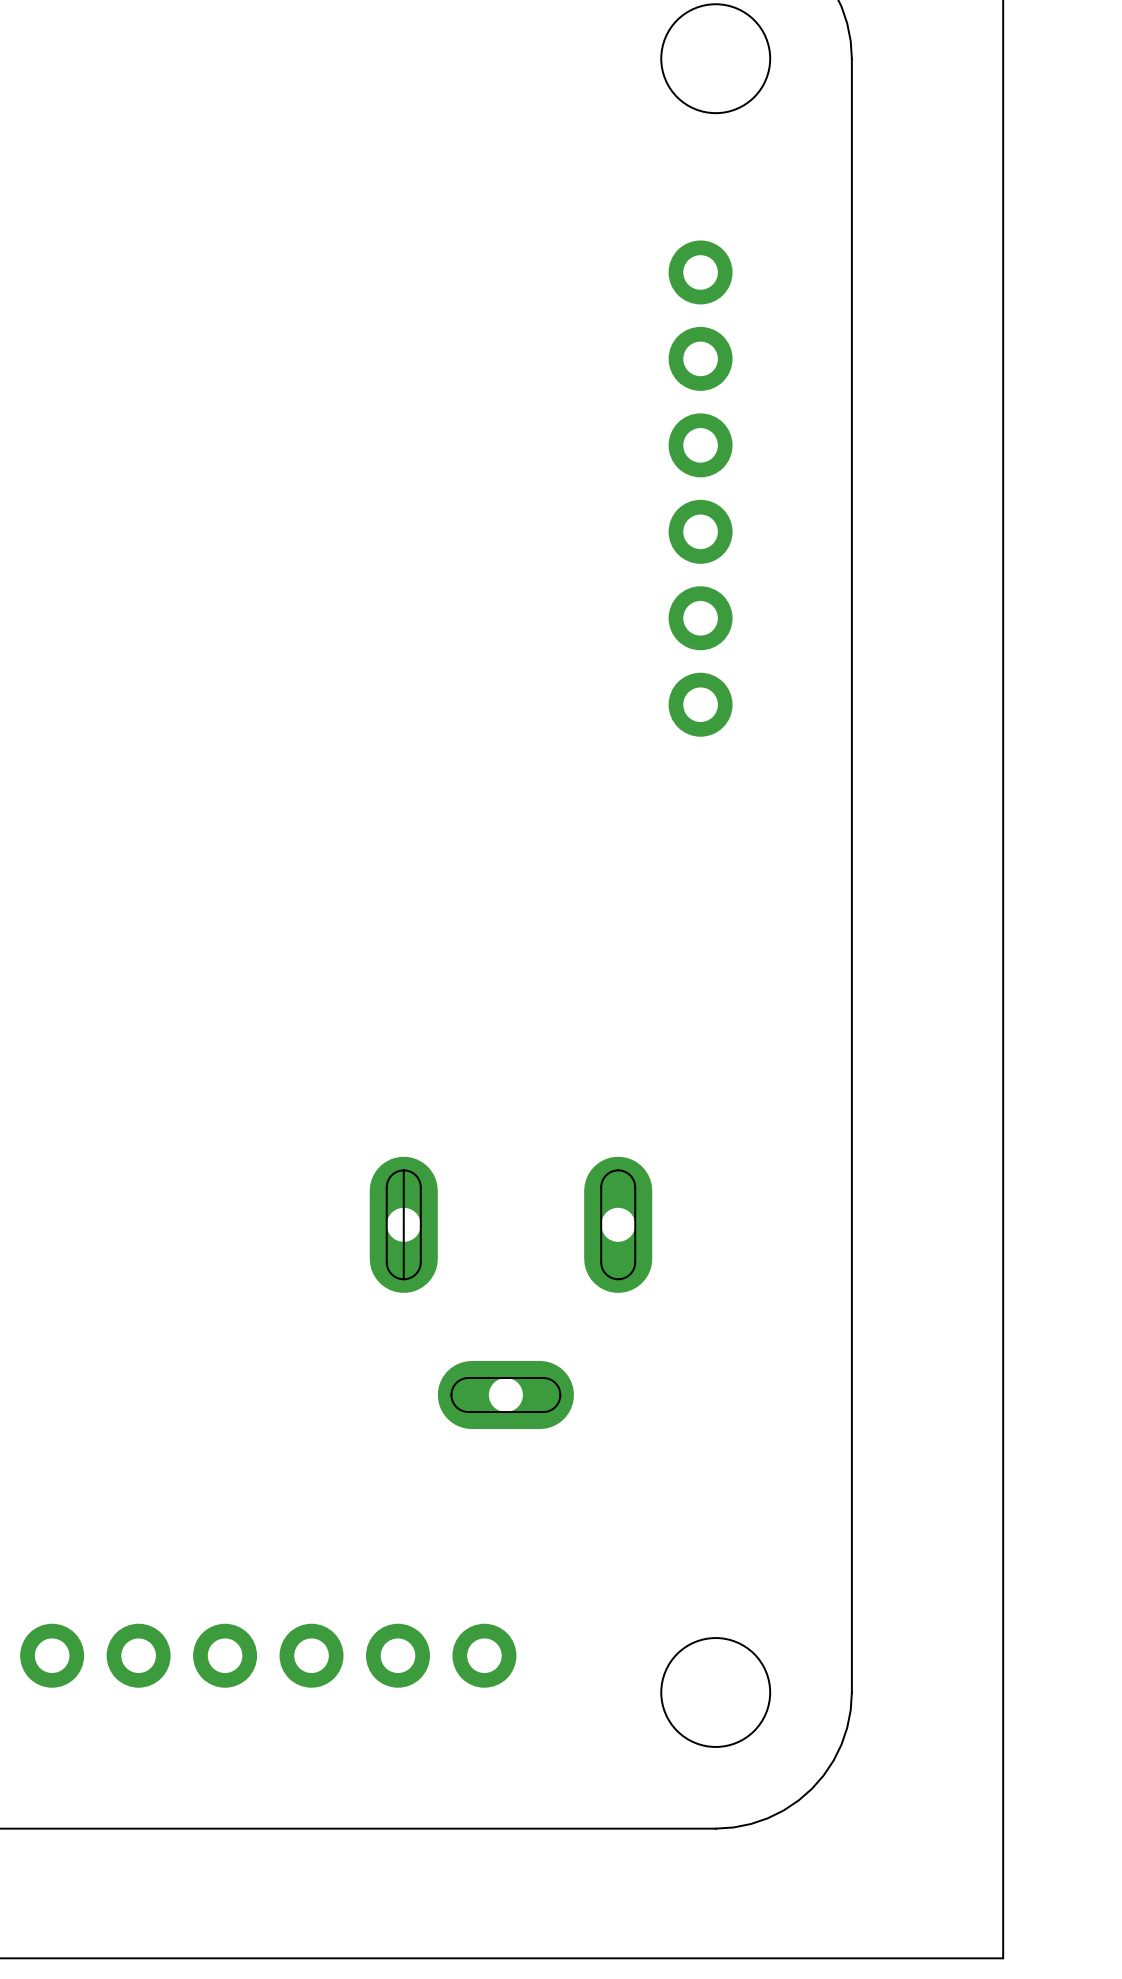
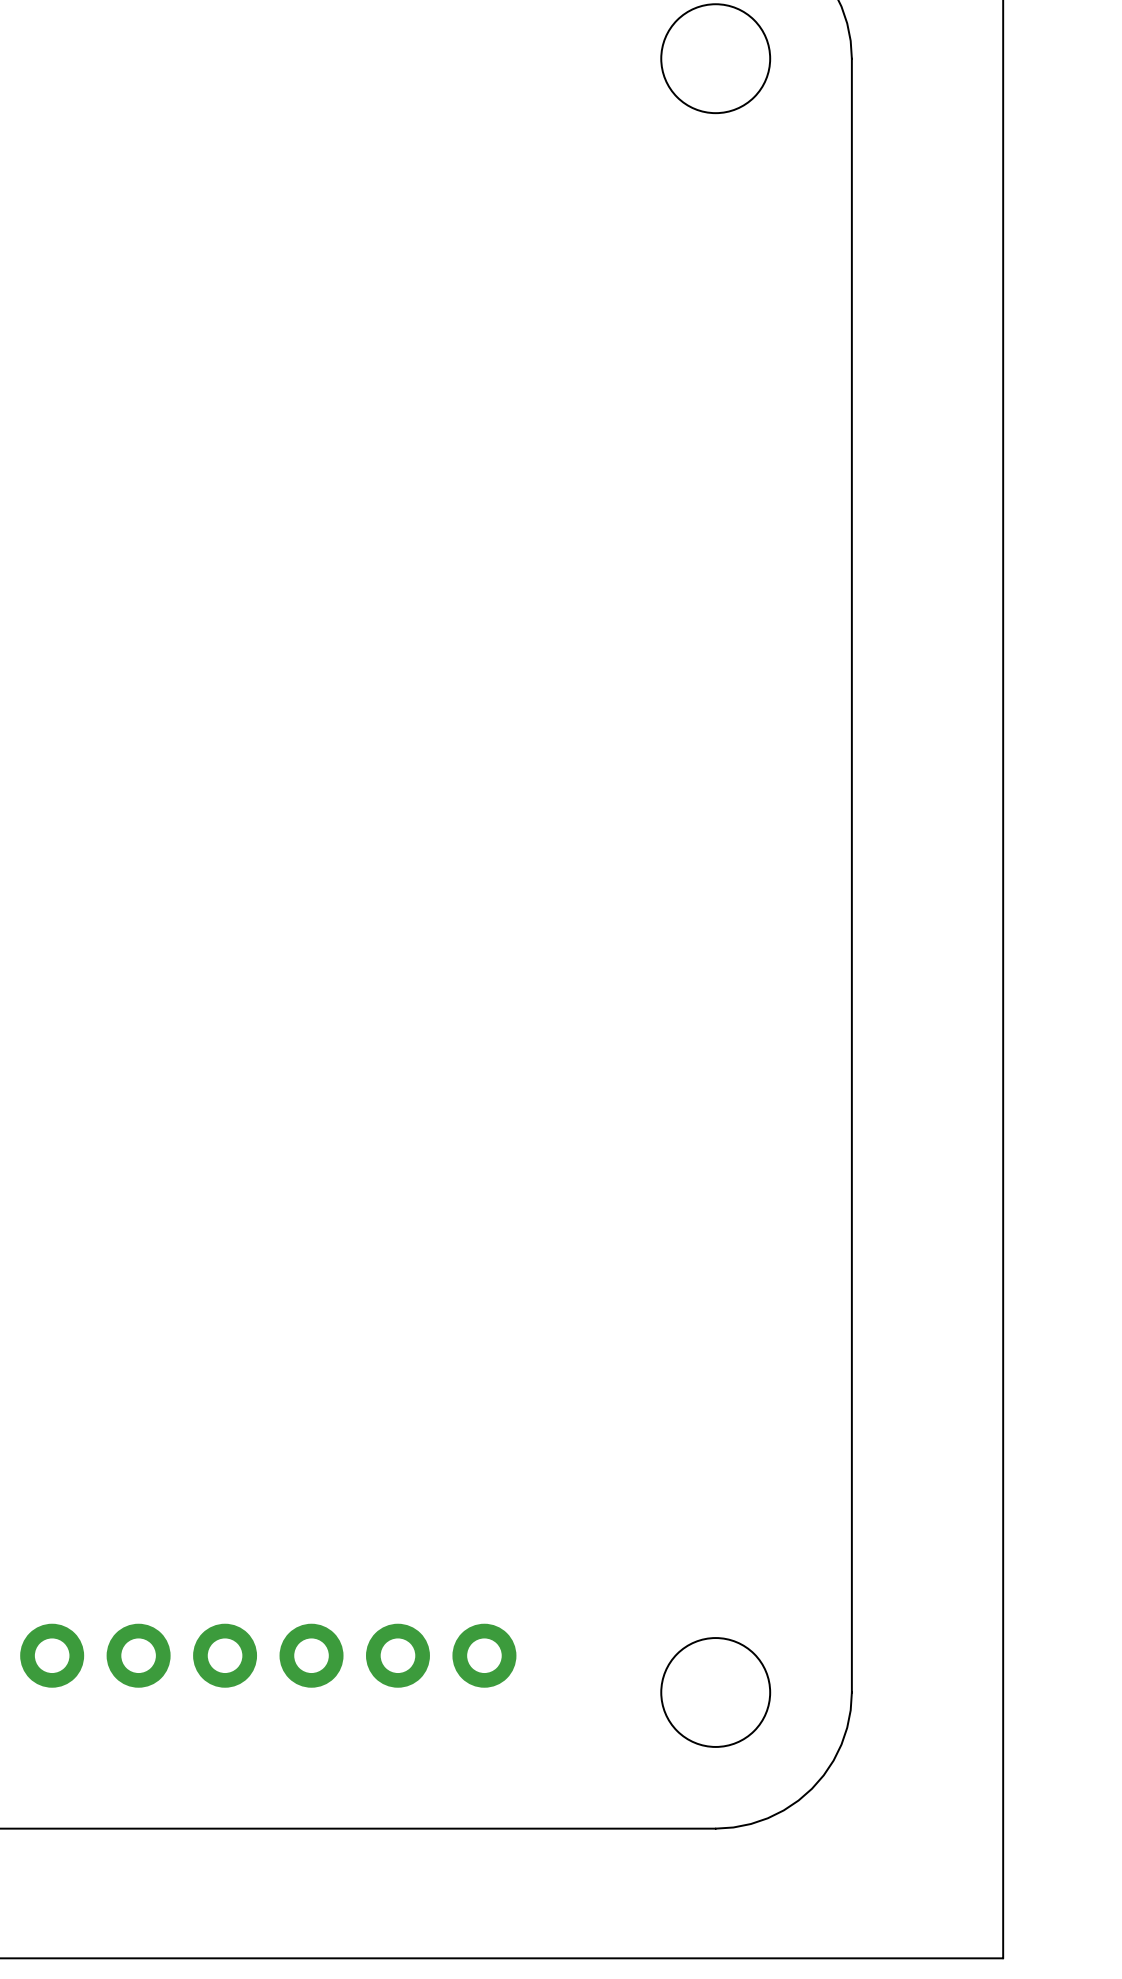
part: (700, 488) -> none
part: (510, 1292) -> none

